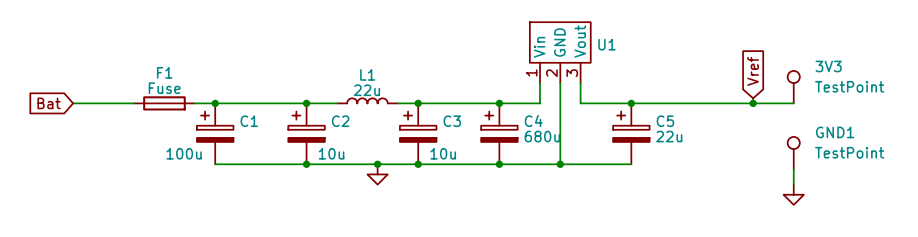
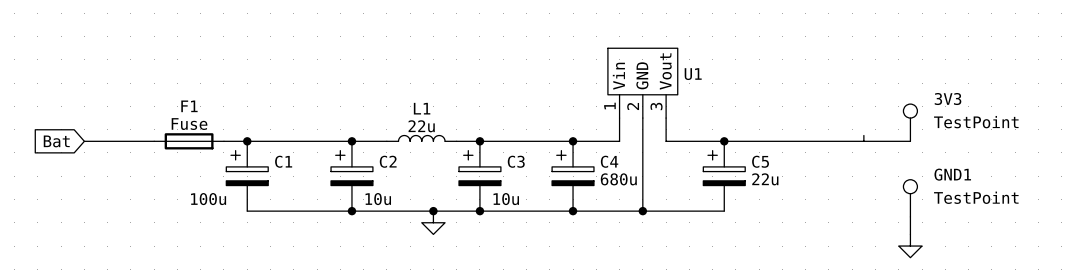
global label: Vref (753, 71) -> none
junction: (753, 103) -> none

